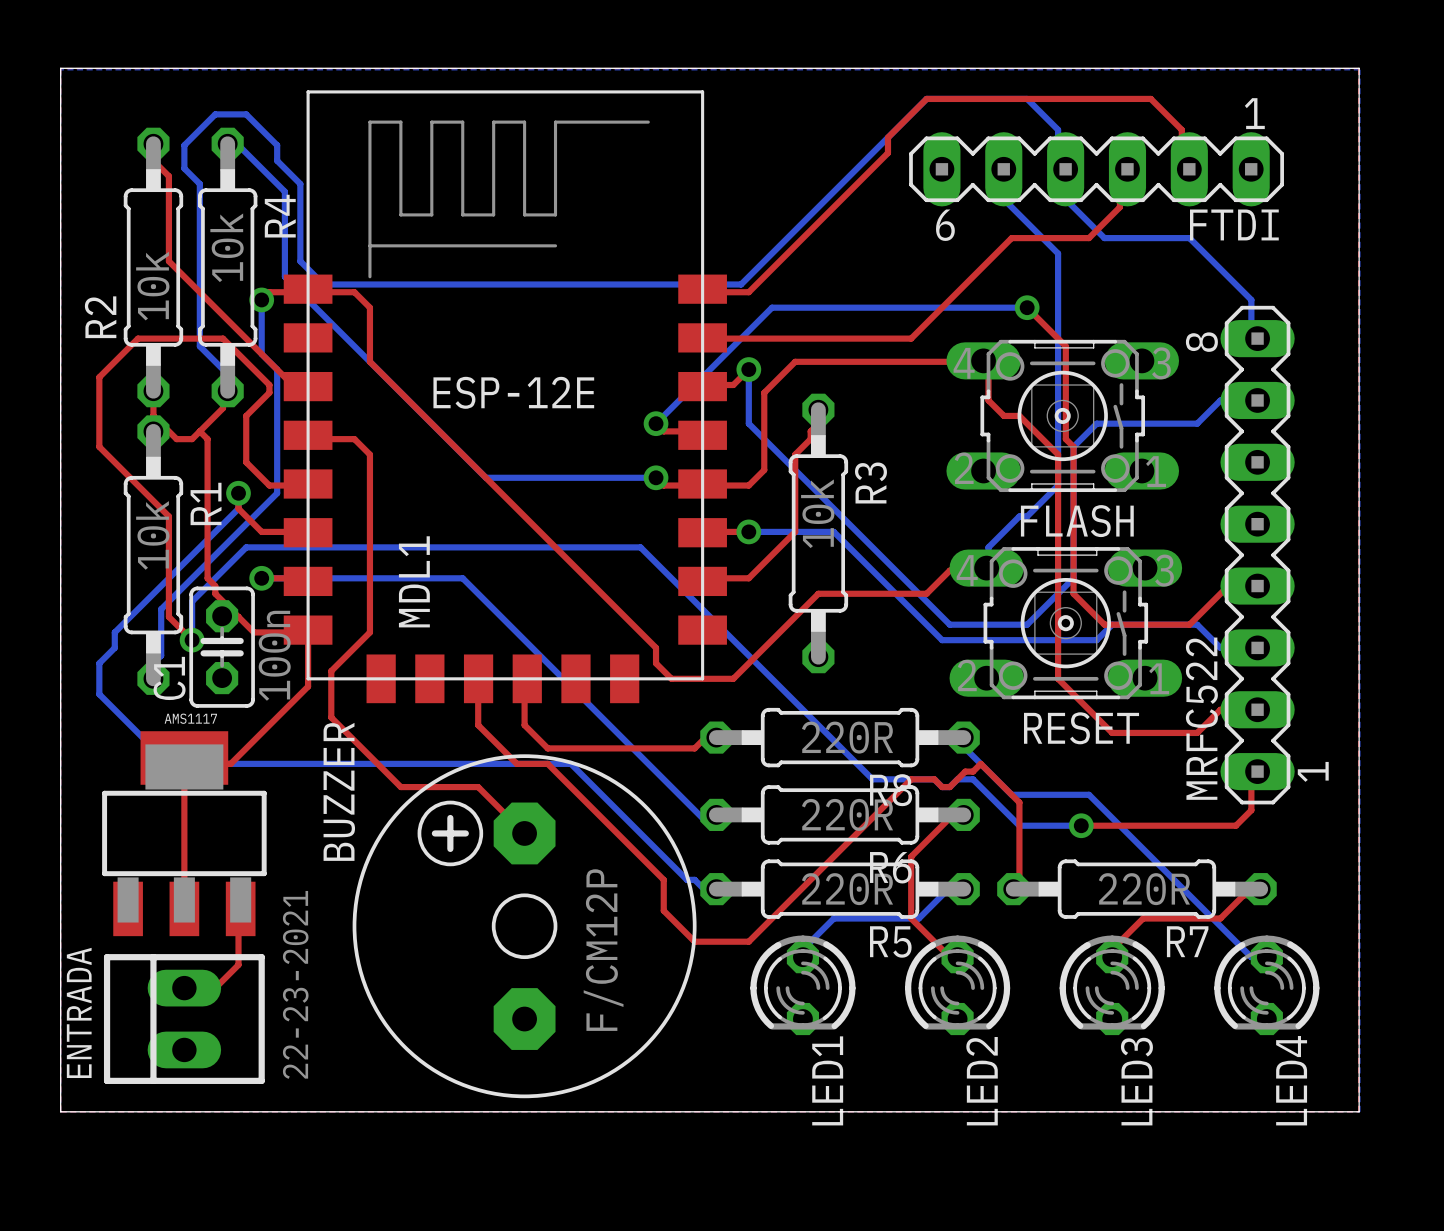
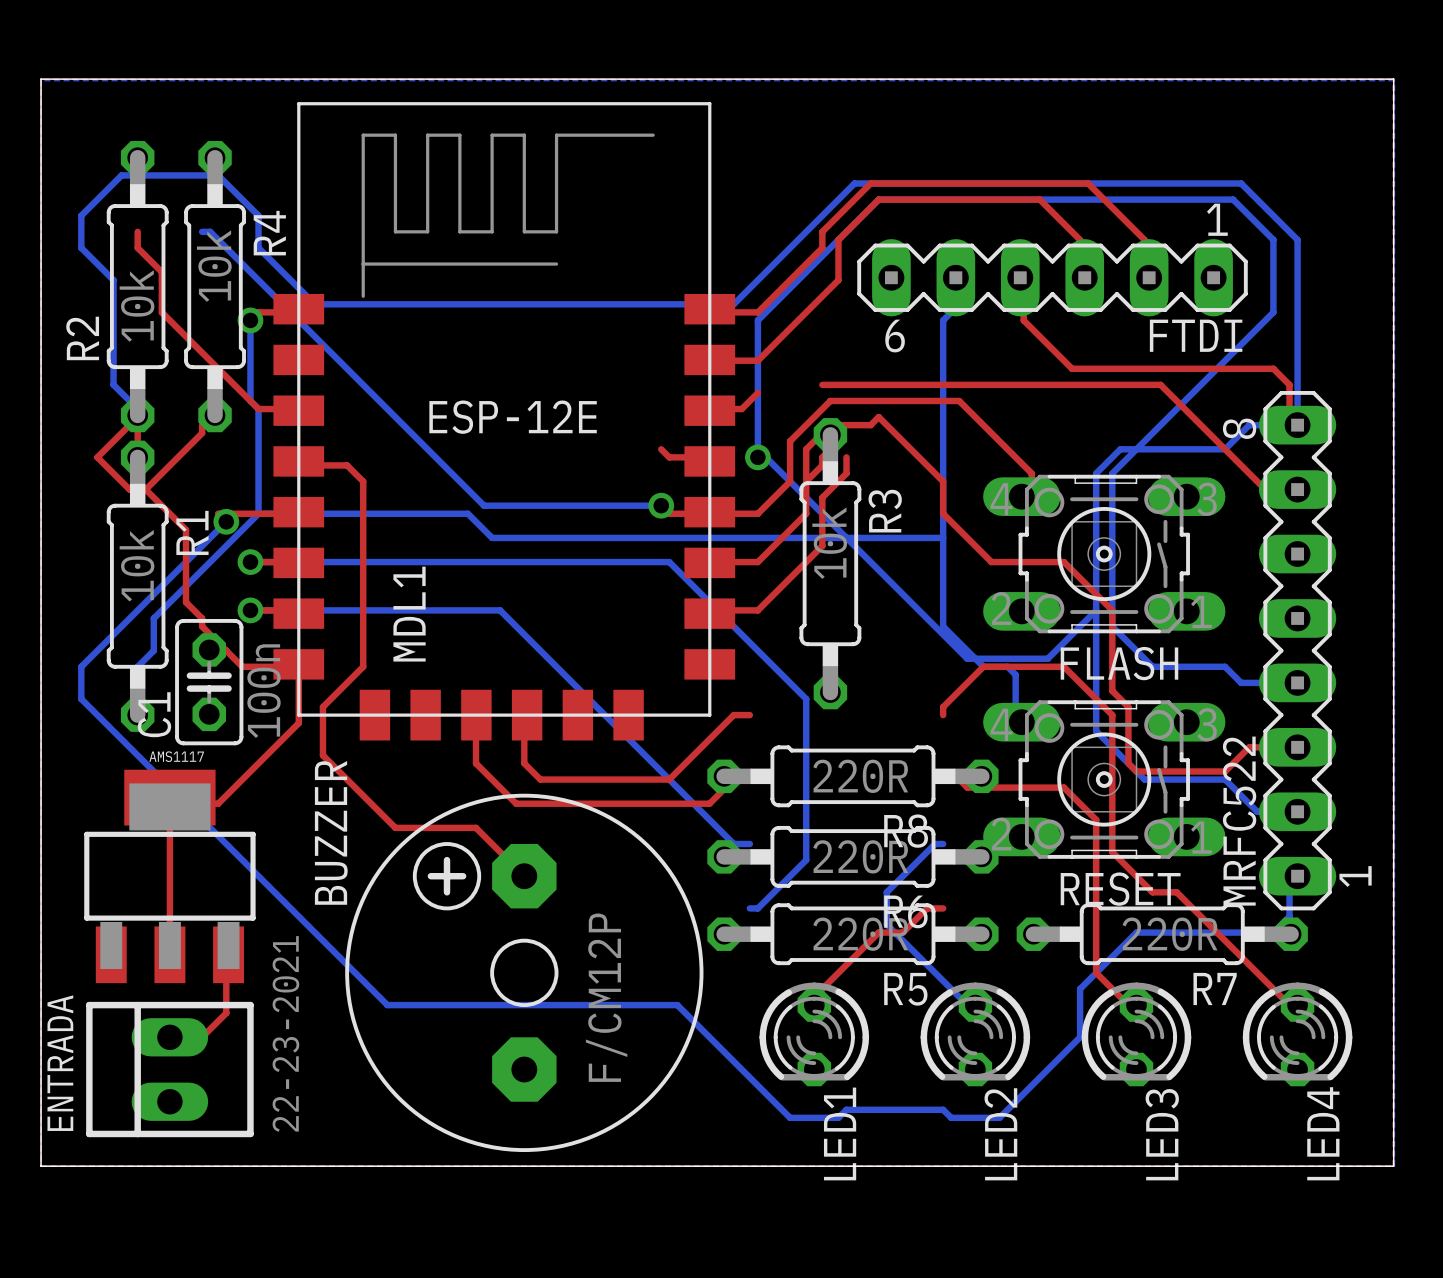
top track: (153, 143) (153, 160) (168, 176) (168, 261) (292, 385) -> none
bottom track: (227, 143) (238, 145) (284, 191) (284, 276) -> (202, 231) (210, 231) (274, 296)
bottom track: (1003, 169) (1003, 199) (1058, 253) (1058, 485) (1027, 516) (1019, 516) (988, 547) (986, 568) -> none
FTDI position: (1096, 169) -> (1052, 277)
top track: (1127, 169) (1119, 176) (1119, 207) (1089, 238) (1011, 238) (911, 338) (748, 338) -> (1084, 277) (1080, 272) (1080, 239) (1039, 199) (878, 199) (838, 239) (838, 280) (757, 360)
top track: (1189, 169) (1181, 168) (1181, 129) (1150, 98) (926, 98) (887, 137) (887, 153) (810, 230) -> (1149, 277) (1144, 272) (1144, 239) (1088, 183) (870, 183) (822, 231) (822, 247)
bottom track: none -> (955, 277) (951, 280) (951, 312) (943, 320) (943, 626) (983, 666) (1007, 666) (1015, 674) (1015, 715) (1021, 722)
top track: none -> (1020, 277) (1023, 280) (1023, 320) (1072, 368) (1273, 368) (1289, 384) (1289, 417) (1297, 425)
bottom track: (300, 261) (300, 183) (277, 160) (277, 145) (246, 114) (215, 114) (184, 145) (184, 168) (199, 183) (199, 346) (238, 385) (230, 392) (227, 391) -> (290, 280) (258, 247) (258, 215) (218, 175) (121, 175) (81, 215) (81, 247) (113, 280) (113, 384) (137, 409) (137, 425)
bottom track: (725, 284) (741, 284) (926, 98) (1027, 98) (1058, 129) (1058, 168) (1065, 169) (1065, 199) (1104, 238) (1189, 238) (1251, 299) (1251, 338) (1257, 338) -> (733, 304) (854, 183) (1241, 183) (1297, 239) (1297, 425)
top track: (308, 292) (354, 292) (369, 307) (369, 361) (656, 647) (656, 663) (671, 678) (725, 678) -> none
bottom track: (1027, 307) (772, 307) (656, 423) -> none
top track: (1027, 307) (1065, 346) (1065, 439) (1073, 446) (1073, 593) (1104, 624) (1189, 624) (1228, 586) (1257, 586) -> none
via: (1027, 307) -> none
top track: (223, 338) (137, 338) (99, 377) (99, 446) (168, 516) (168, 616) (192, 640) -> (210, 360) (161, 312) (161, 272) (137, 247) (137, 231)
bottom track: (261, 354) (277, 369) (277, 493) (161, 609) (161, 655) (153, 663) (153, 678) -> (250, 376) (250, 400) (258, 409) (258, 513)
top track: (810, 361) (795, 361) (764, 392) (764, 470) -> (1021, 496) (1023, 489) (1031, 481) (1031, 473) (959, 400) (830, 400) (790, 441) (790, 481) (774, 497)
top track: (980, 361) (988, 361) (988, 400) (1003, 415) (1019, 415) (1058, 454) (1058, 678) (1104, 725) -> (806, 481) (806, 449) (830, 425) (870, 425) (878, 417) (943, 481) (943, 513) (991, 562) (1063, 562) (1112, 610) (1112, 690) (1128, 707) (1128, 763)
top track: none -> (999, 384) (1160, 384) (1265, 489) (1297, 489)
via: (748, 369) -> none
top track: (269, 385) (269, 392) (246, 415) (246, 462) (269, 485) -> (258, 409) (282, 409)
top track: (227, 391) (223, 392) (223, 408) (192, 439) (176, 439) (153, 415) -> none
top track: none -> (137, 425) (129, 425) (97, 457) (129, 489) (145, 489)
top track: none -> (202, 425) (202, 433) (145, 489)
FLASH position: (1062, 415) -> (1104, 554)
via: (656, 423) -> none
top track: (199, 431) (207, 439) (207, 578) -> (145, 489) (186, 529) (186, 602) (194, 610)
via: none -> (757, 457)
top track: none -> (846, 457) (846, 473) (822, 497) (822, 545) (806, 562)
bottom track: none -> (218, 513) (218, 529) (81, 666) (81, 699) (387, 1005) (677, 1005) (790, 1117) (838, 1117) (846, 1109) (943, 1109) (951, 1117) (999, 1117) (1080, 1037) (1080, 988) (1136, 932) (1273, 932) (1289, 916) (1289, 884) (1297, 876)
top track: none -> (218, 513) (258, 513)
bottom track: none -> (258, 513) (153, 618) (153, 650) (137, 666) (137, 682)
bottom track: none -> (258, 513) (467, 513) (492, 537) (943, 537)
top track: (795, 485) (795, 531) -> (806, 513) (757, 562)
bottom track: (238, 493) (238, 508) (114, 632) (114, 647) (99, 663) (99, 694) (168, 763) (570, 763) (686, 879) (694, 879) (710, 895) (716, 889) -> none
top track: (238, 493) (238, 508) (261, 531) -> none
bottom track: none -> (250, 562) (669, 562) (806, 699) (806, 860) (757, 908) (749, 908)
bottom track: (748, 531) (833, 531) (942, 640) (1096, 640) (1112, 624) (1197, 624) (1220, 647) -> (757, 392) (757, 320) (878, 199) (1233, 199) (1273, 239) (1273, 312) (1112, 473) (1112, 626) (1152, 666) (1225, 666) (1241, 682) (1249, 682)
via: (748, 531) -> none
MRFC522 position: (1257, 555) -> (1297, 650)
top track: (986, 568) (980, 570) (949, 570) (926, 593) (818, 593) (733, 678) -> (749, 715) (741, 715)
bottom track: (462, 578) (710, 825) (717, 818) (716, 814) -> (459, 610) (500, 610) (733, 843) (749, 843)
bottom track: none -> (1096, 610) (1096, 731) (1144, 779) (1225, 779) (1257, 811) (1297, 811)
RESET position: (1065, 623) -> (1104, 779)
bottom track: (192, 640) (192, 601) (246, 547) (640, 547) (872, 779) (934, 779) (942, 787) (949, 787) (957, 779) (973, 779) (1019, 825) (1081, 825) -> none
via position: (192, 640) -> (250, 562)
top track: none -> (943, 715) (943, 707) (983, 666) (1063, 666) (1112, 715) (1112, 852) (1152, 892) (1176, 892) (1289, 1005) (1297, 1005)
top track: (716, 737) (710, 732) (694, 748) (547, 748) (540, 740) -> (733, 715) (669, 779) (540, 779)
bottom track: (963, 737) (965, 748) (1011, 794) (1089, 794) (1251, 957) (1266, 957) -> none
top track: (547, 763) (663, 879) (663, 910) (694, 941) (748, 941) (911, 779) (934, 779) (942, 787) (949, 787) (965, 771) (973, 771) (980, 763) (1019, 802) (1019, 887) (1013, 889) -> (548, 803) (709, 803) (733, 779) (749, 779)
top track: (1257, 771) (1251, 771) (1251, 810) (1235, 825) (1081, 825) -> none
bottom track: none -> (943, 843) (935, 843) (886, 892) (886, 924) (967, 1005) (975, 1005)
top track: (963, 814) (957, 810) (911, 856) (911, 918) (949, 957) (957, 957) -> none
via: (1081, 825) -> none
top track: none -> (943, 908) (927, 908) (902, 932) (878, 932) (814, 997) (814, 1005)
bottom track: (963, 889) (965, 887) (957, 879) (918, 918) (833, 918) (802, 949) (802, 957) -> none
top track: (1260, 889) (1259, 895) (1243, 895) (1220, 918) (1143, 918) (1112, 949) (1112, 957) -> (943, 779) (959, 779) (967, 787) (1063, 787) (1096, 819) (1096, 972) (1128, 1005) (1136, 1005)

